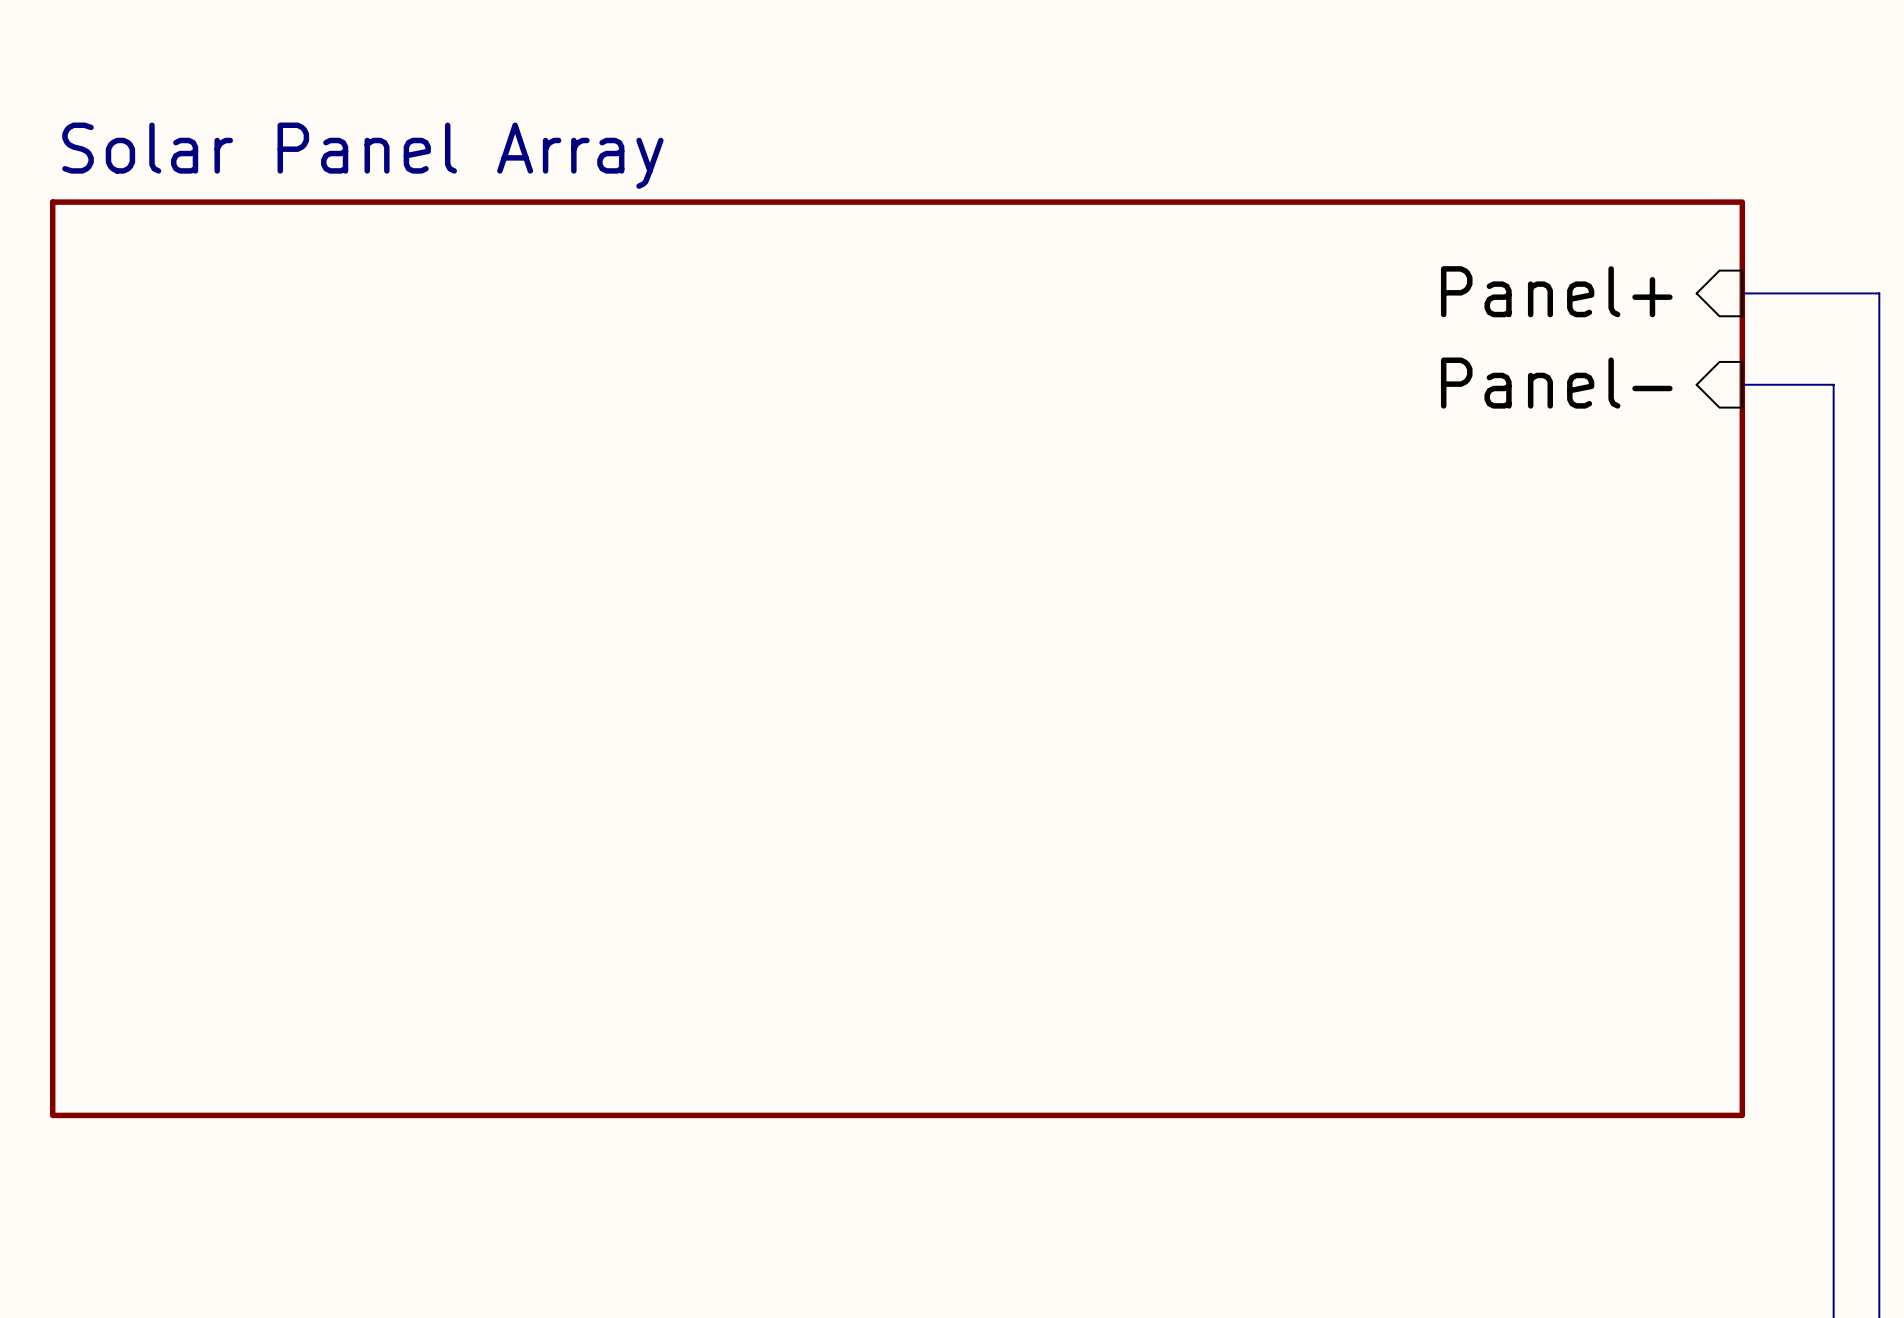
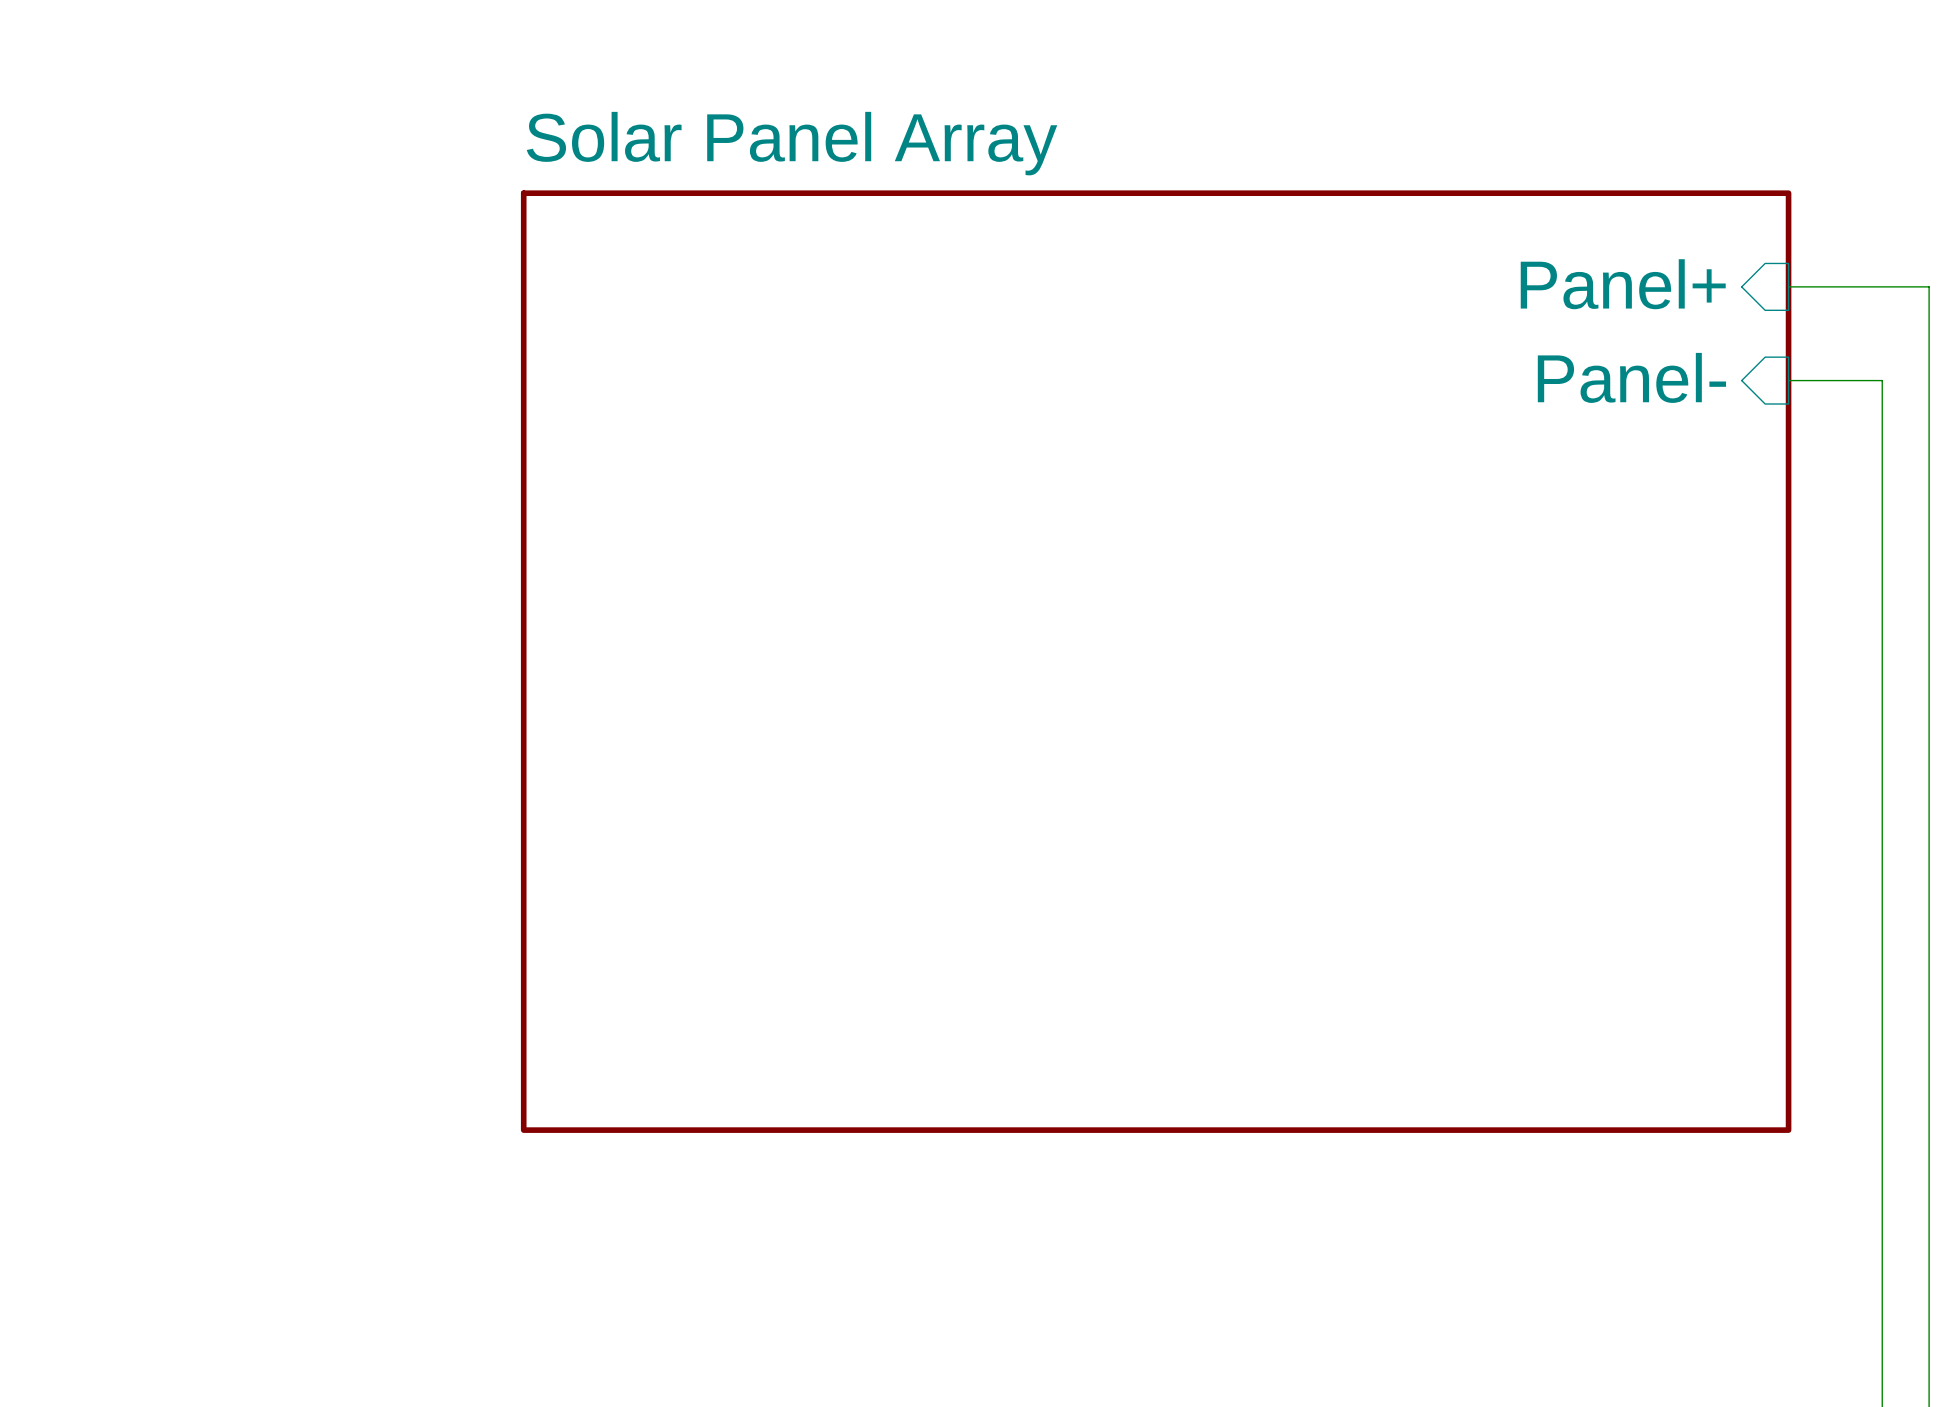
sheet Solar Panel Array: (897, 658) -> none
sheet Solar Panel Array: none -> (1156, 661)

